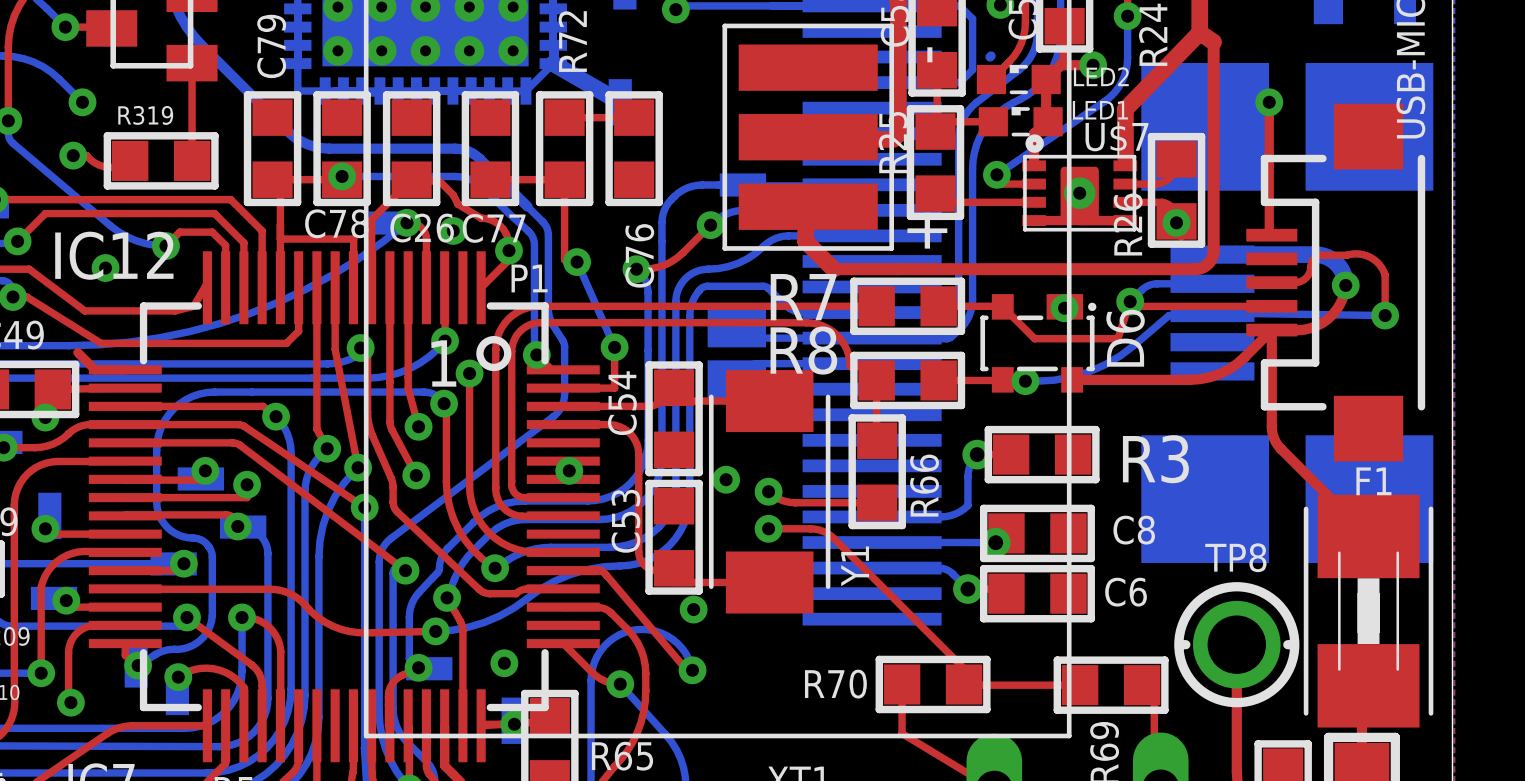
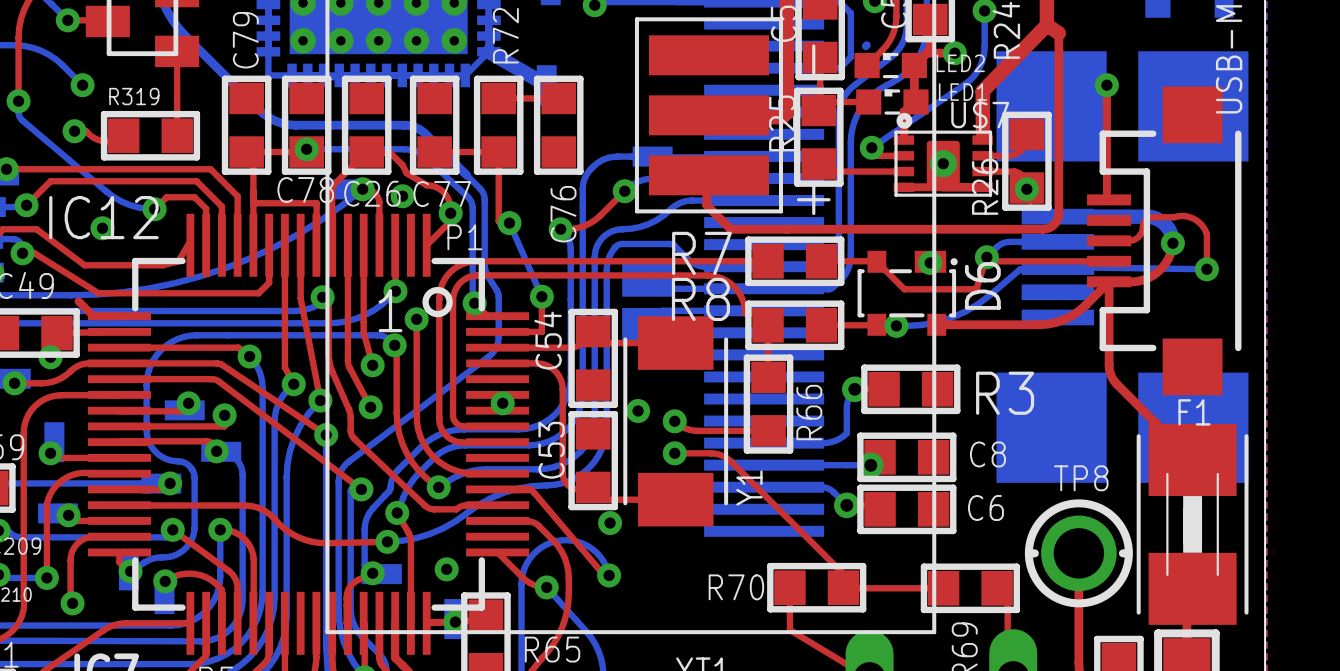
top track width: thick (1213, 42) (1213, 250) (1209, 261) (1202, 267) (833, 269) (805, 241) (805, 209) -> thin (1058, 33) (1058, 213) (1055, 223) (1049, 228) (730, 229) (706, 205) (706, 177)

